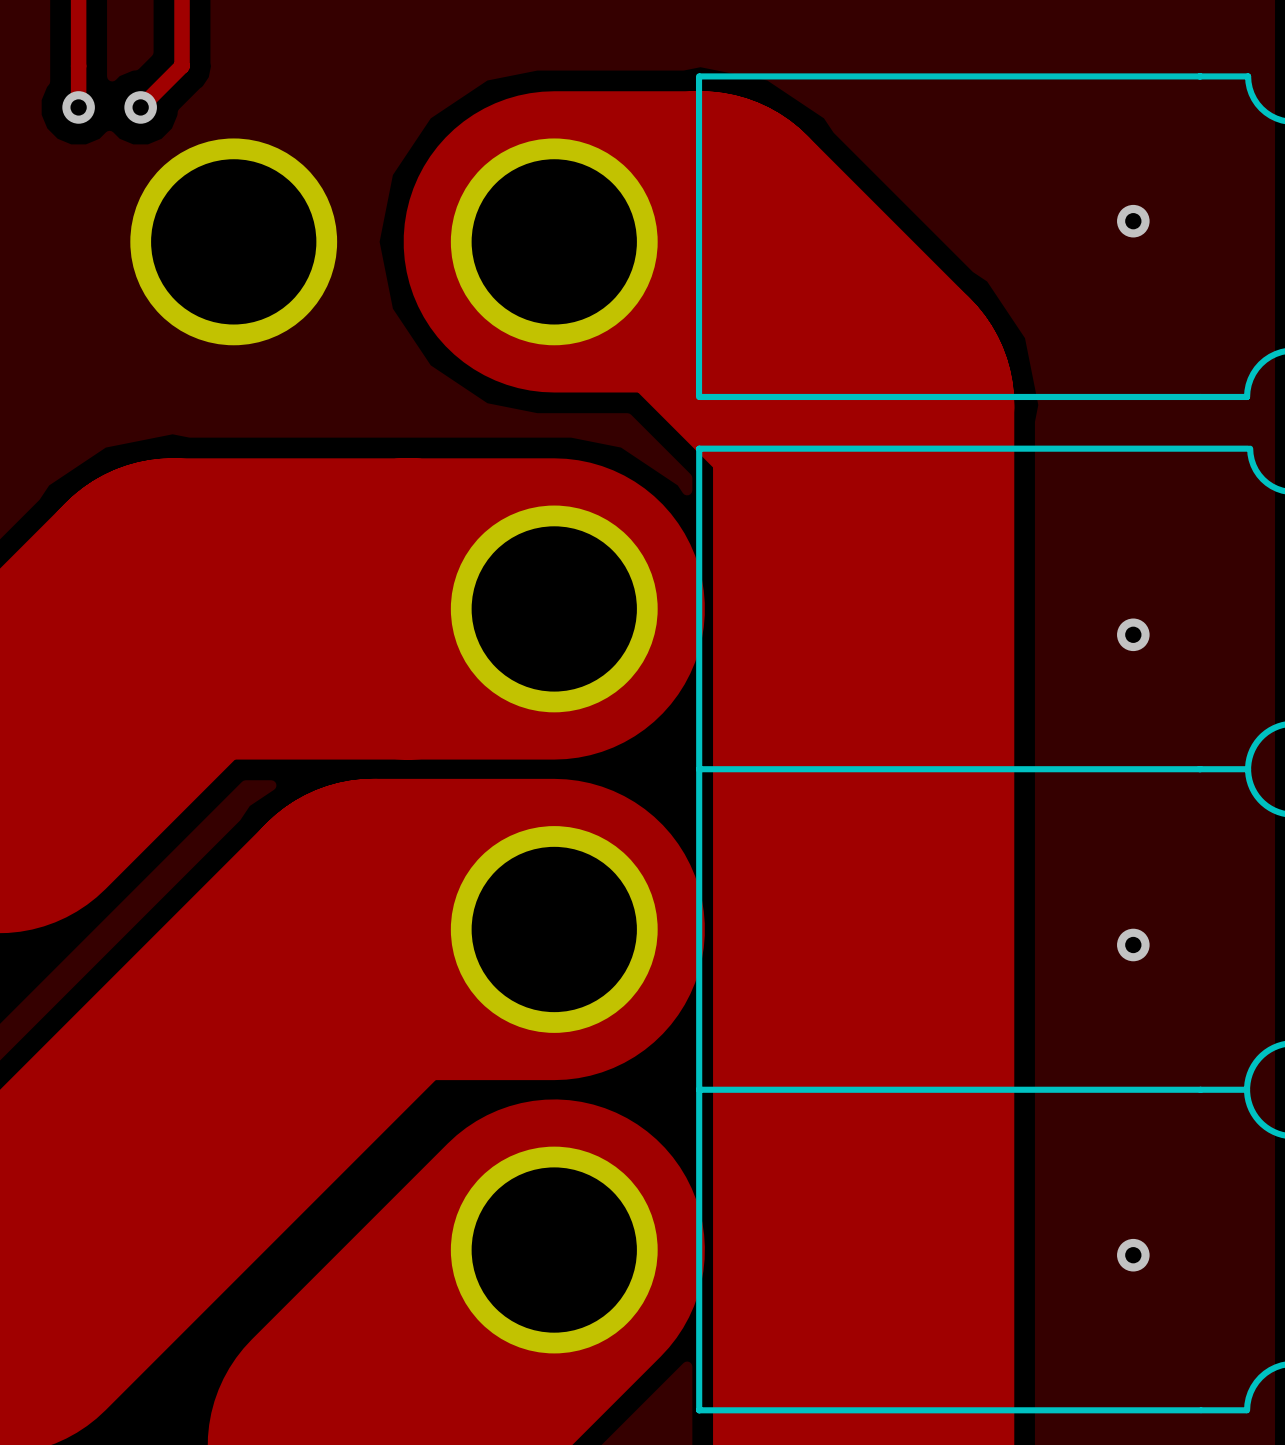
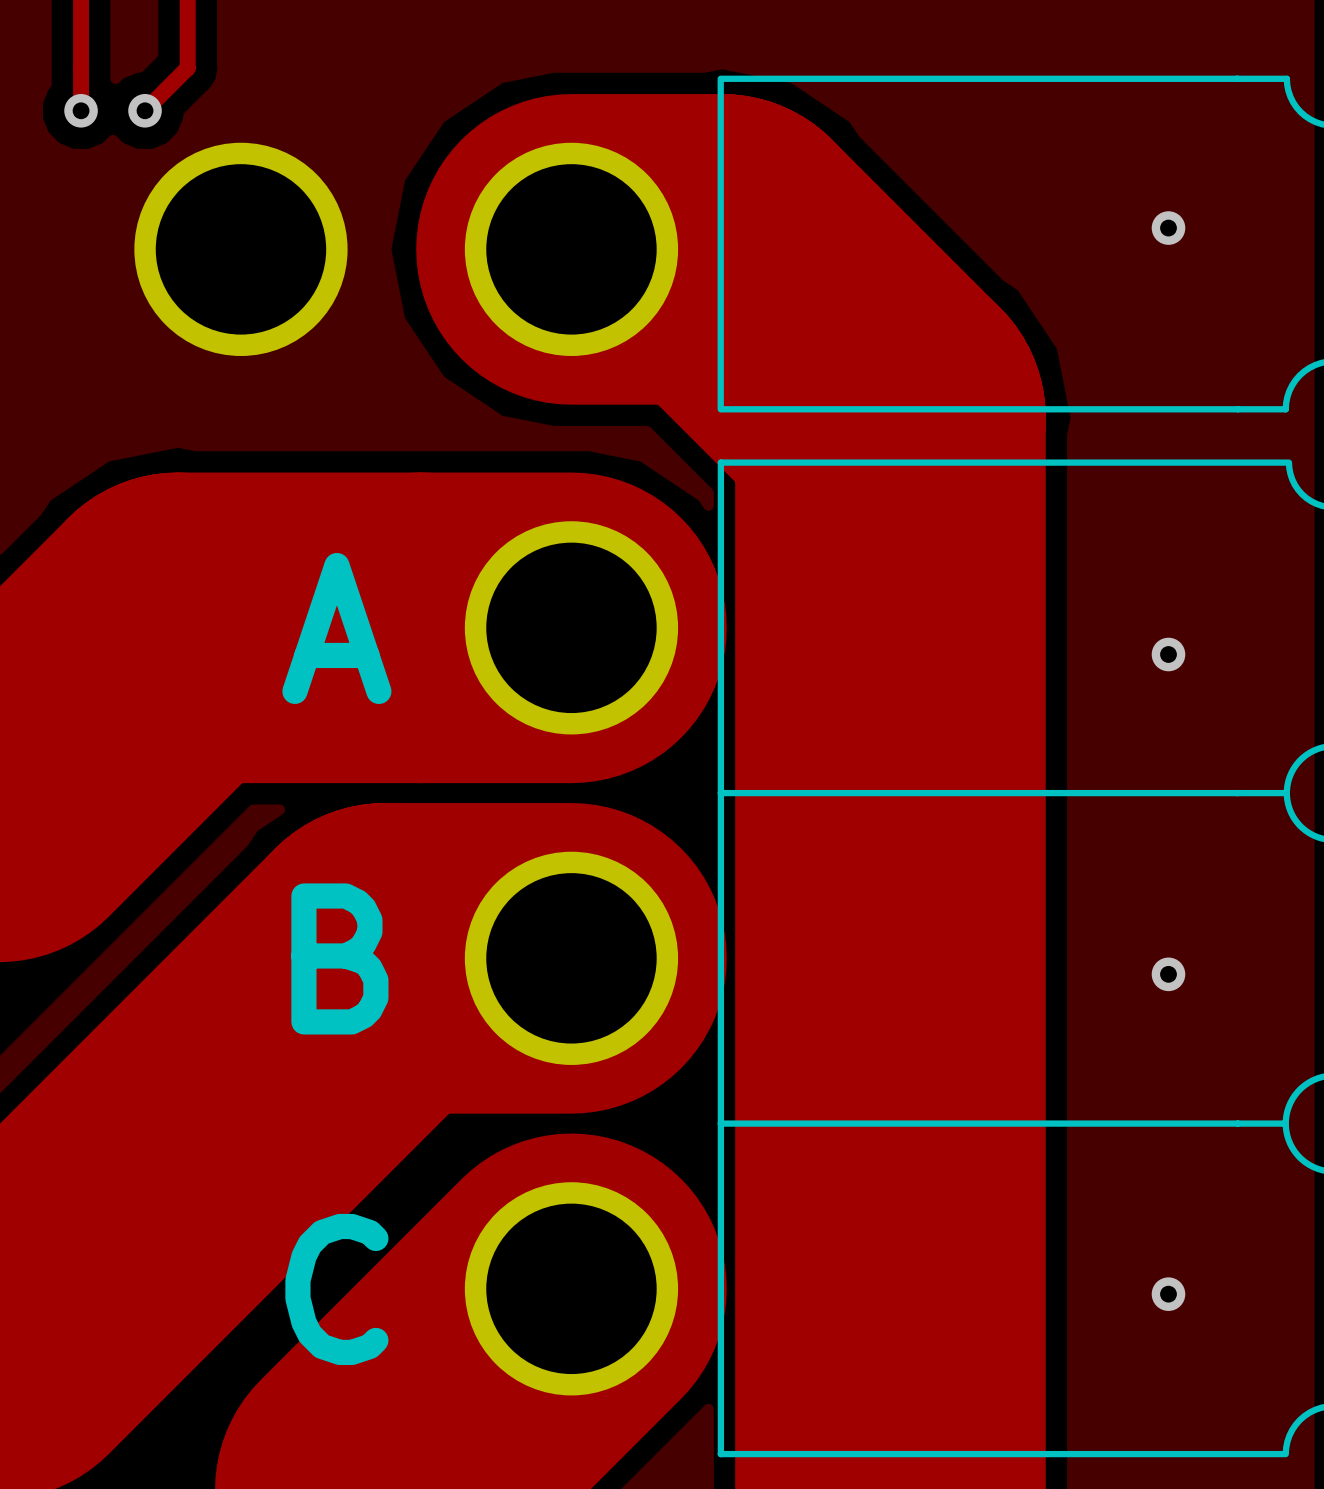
text: none -> A (336, 628)
text: none -> B (339, 958)
text: none -> C (336, 1289)

